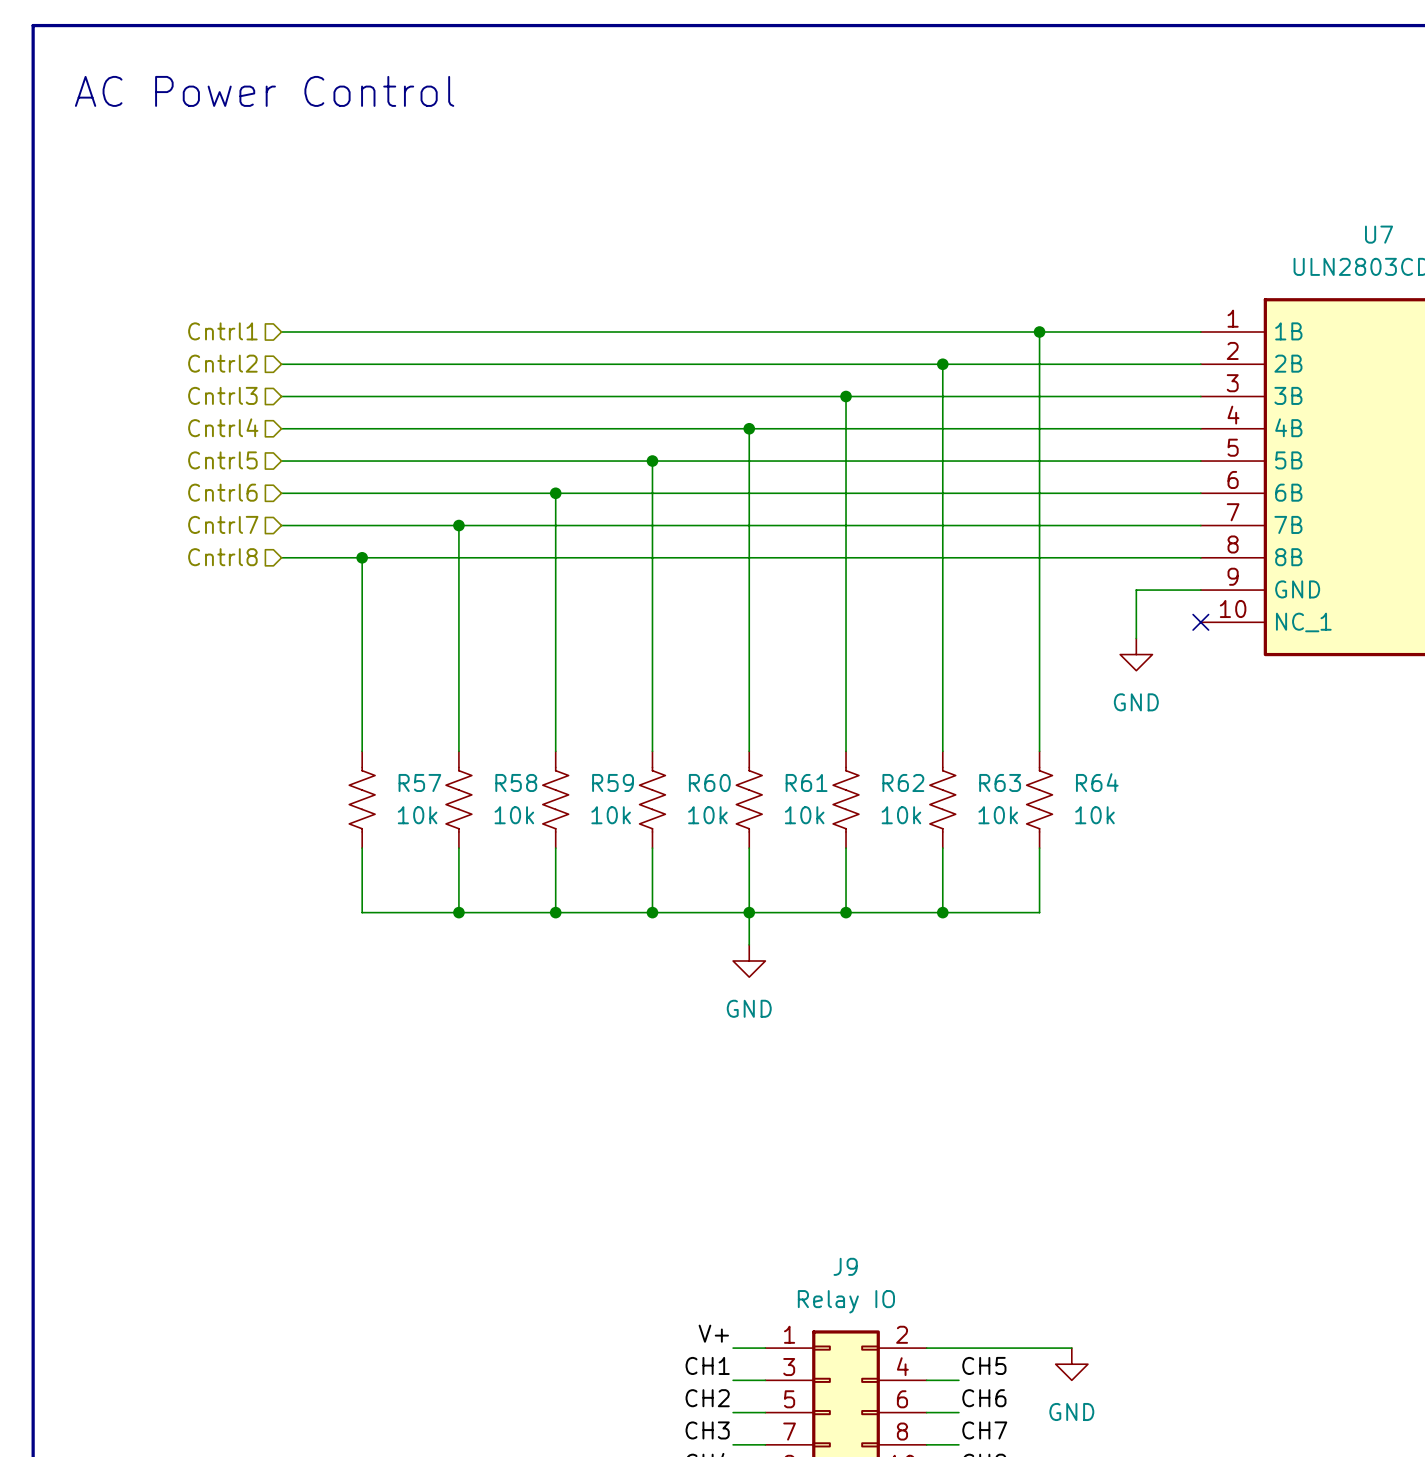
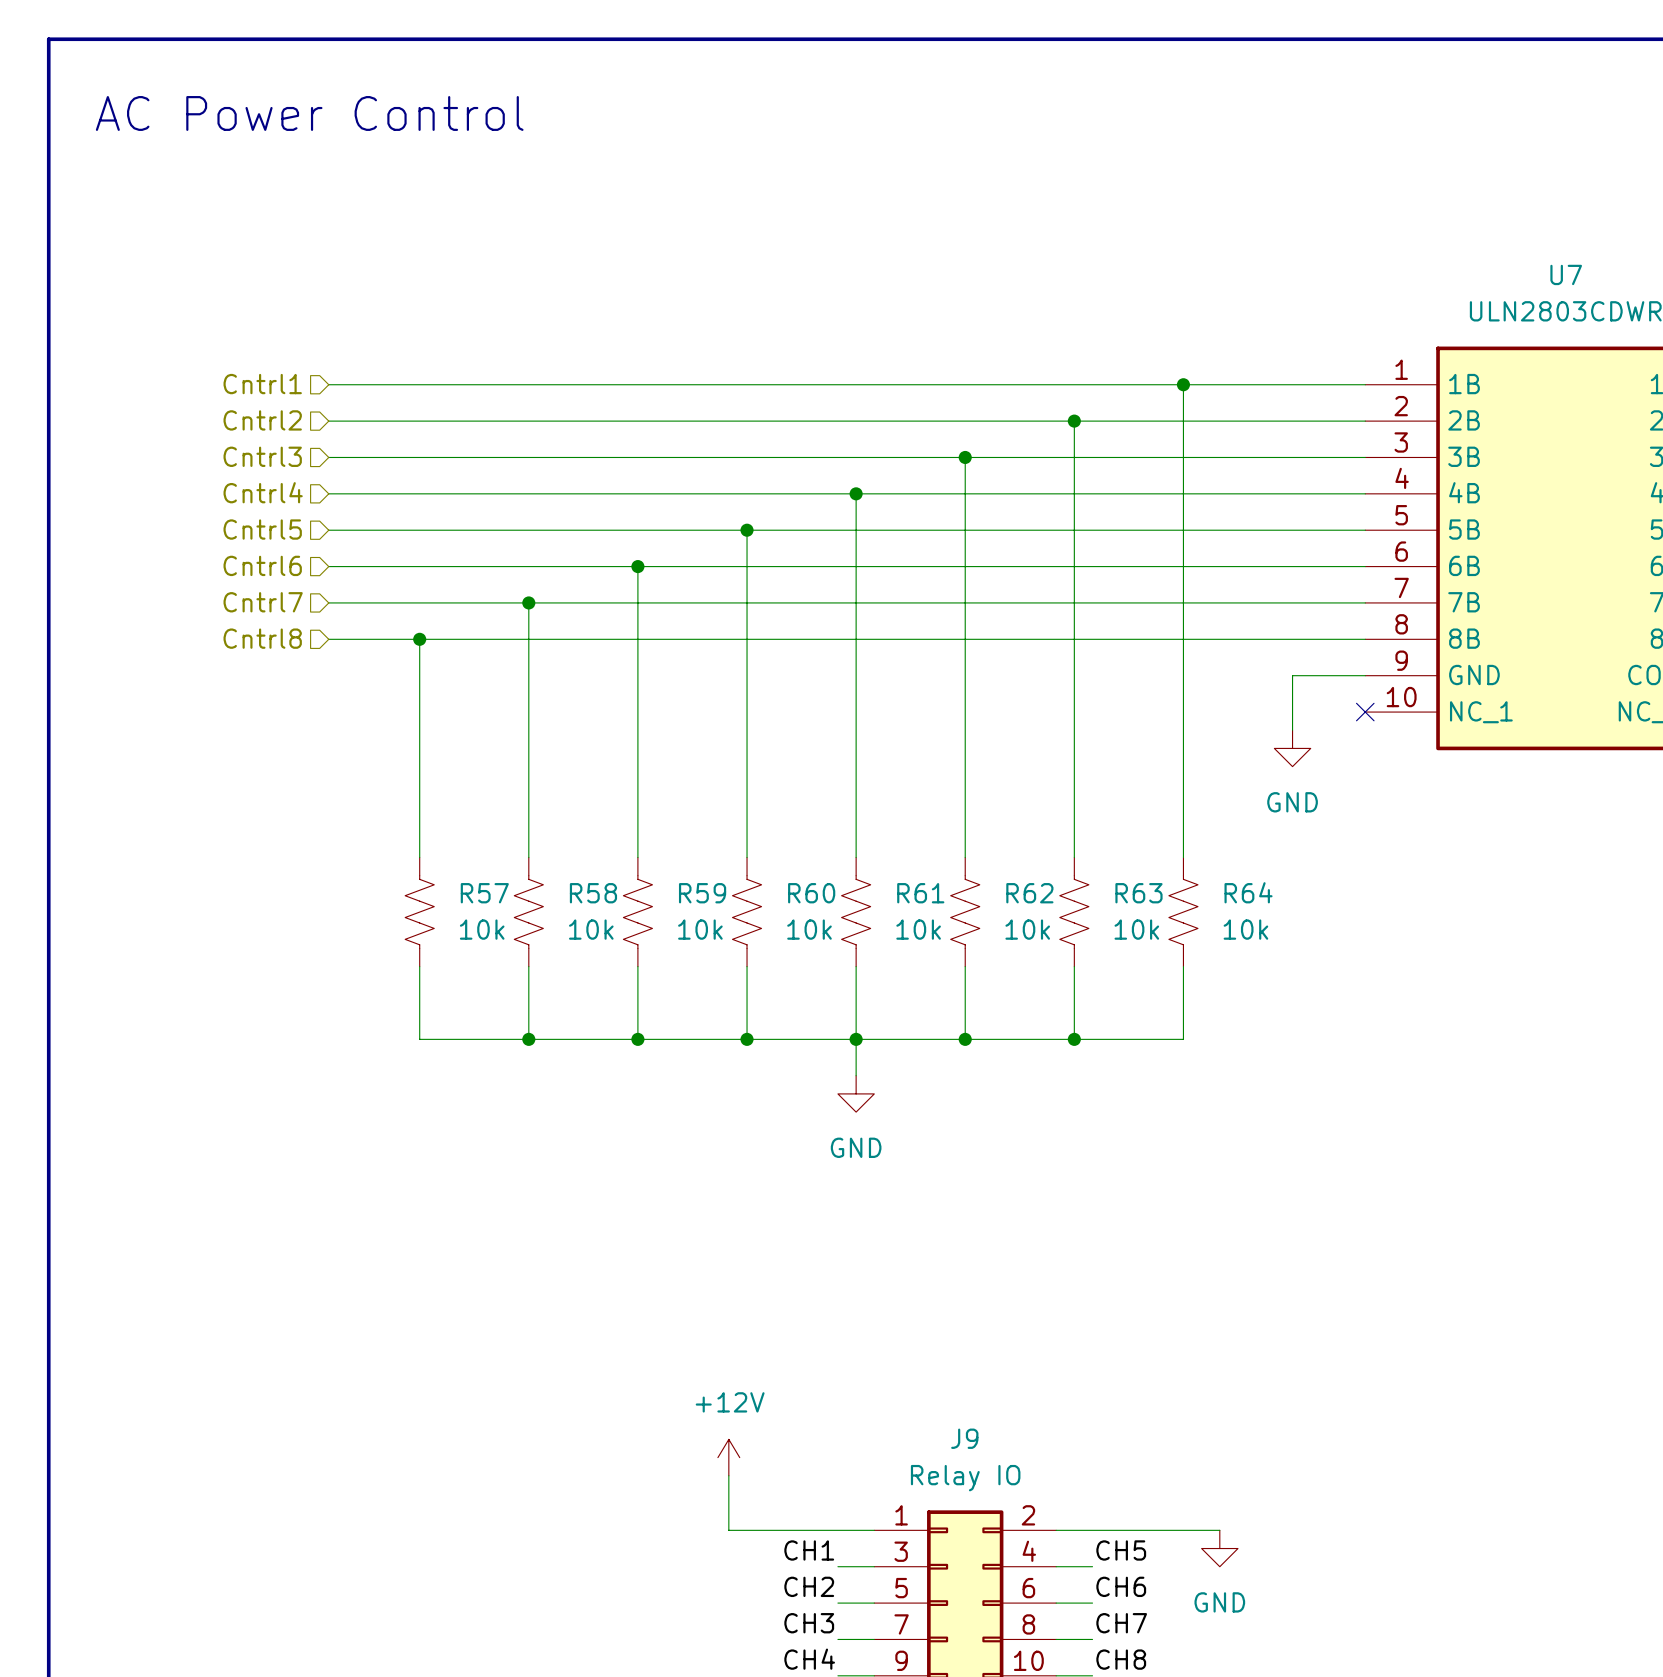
power symbol: none -> +12V (728, 1457)
wire: none -> (728, 1475) (728, 1530) (837, 1530)
label: V+ (713, 1333) -> none

